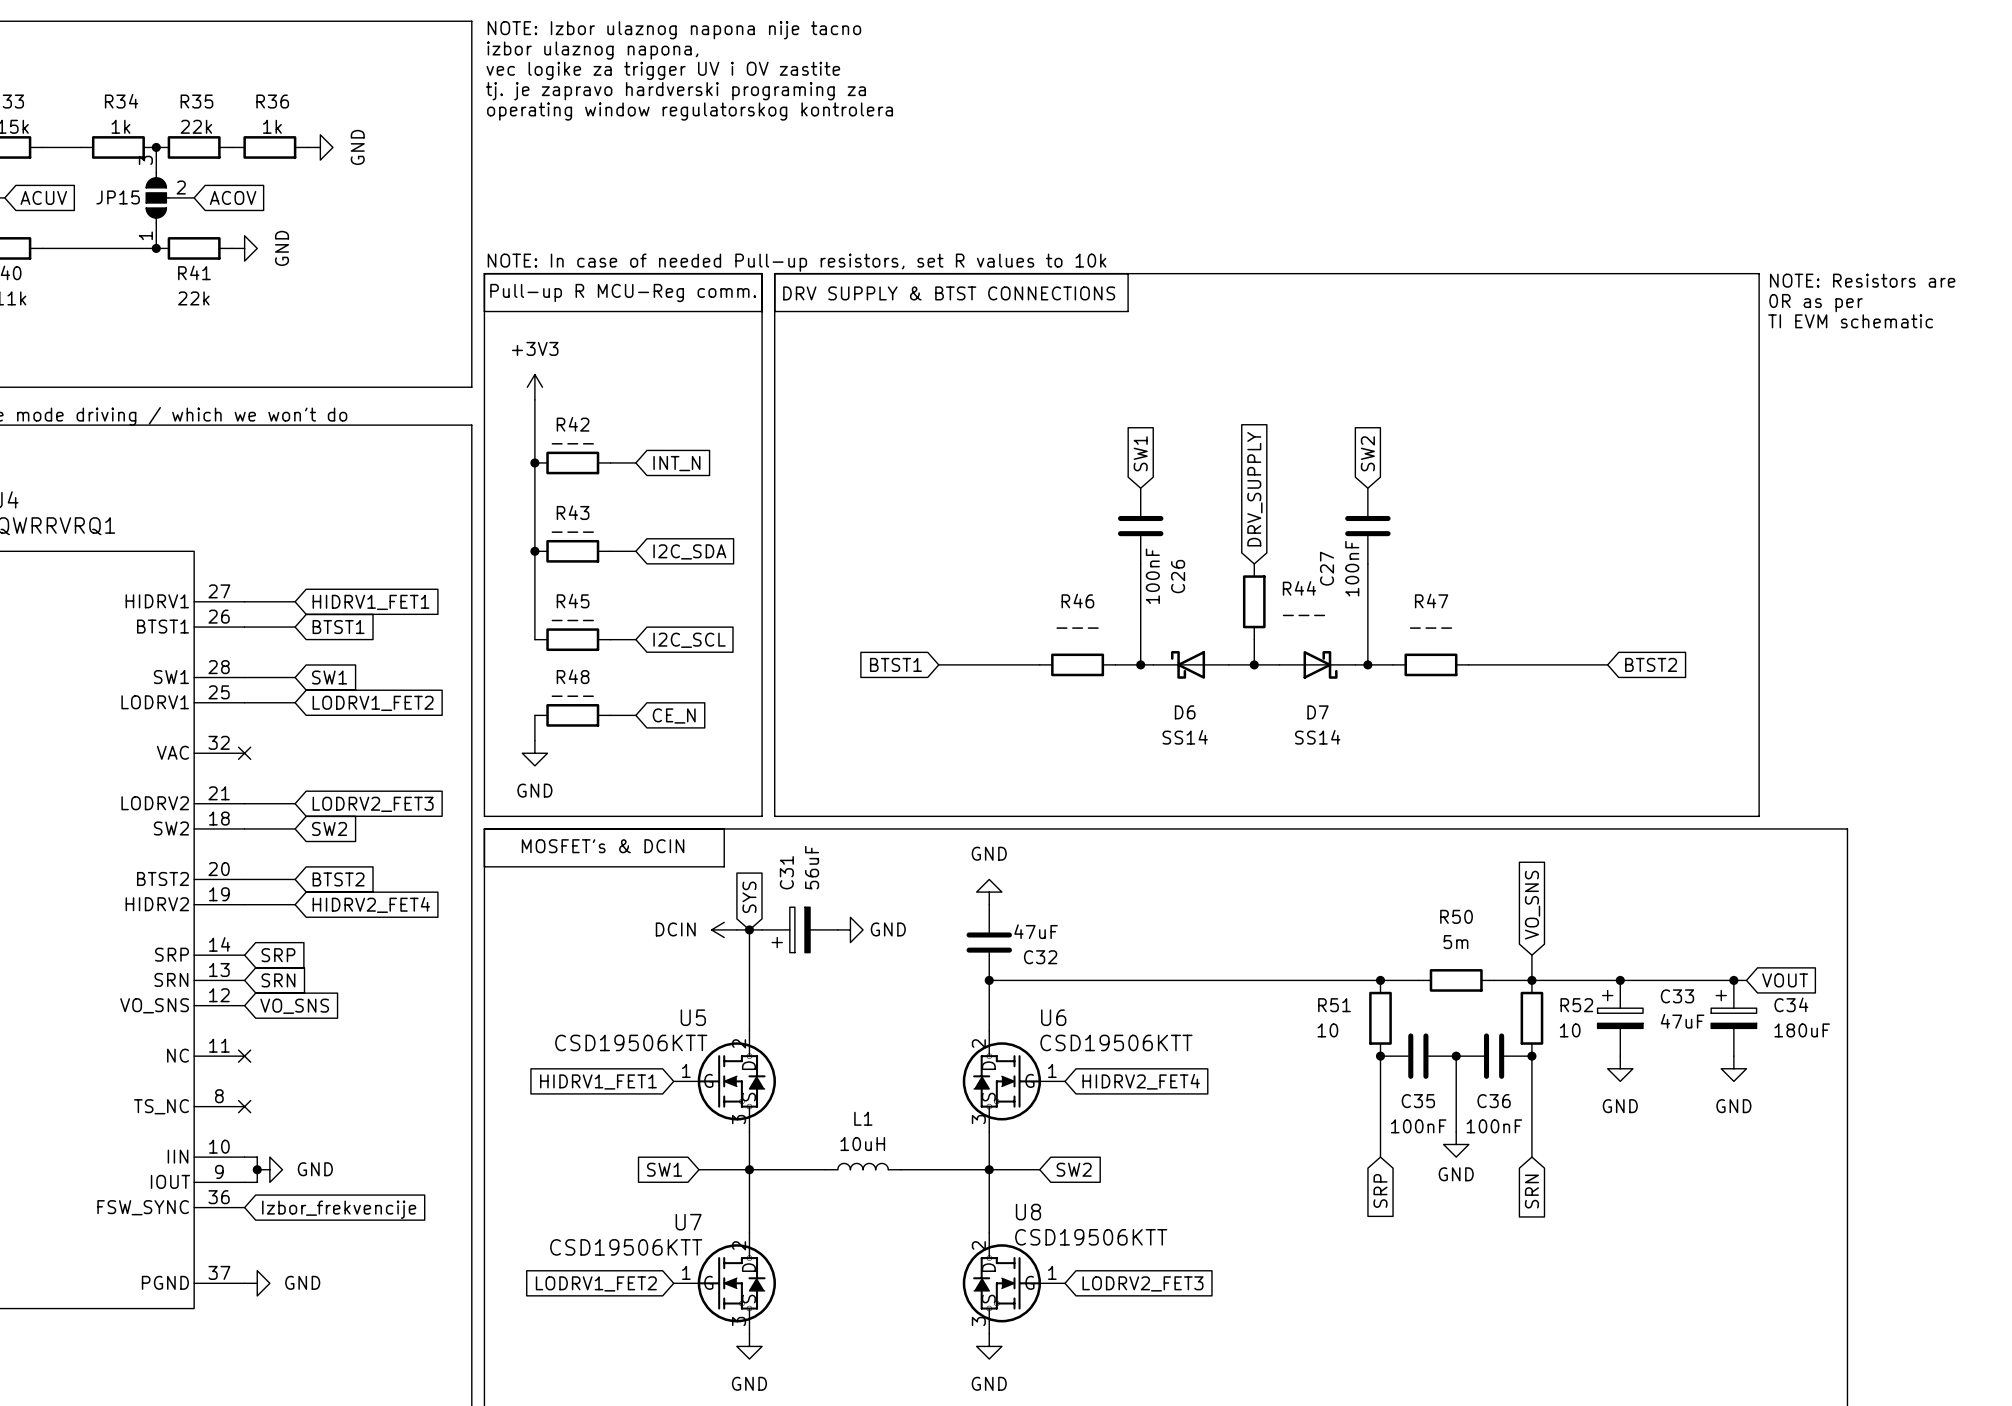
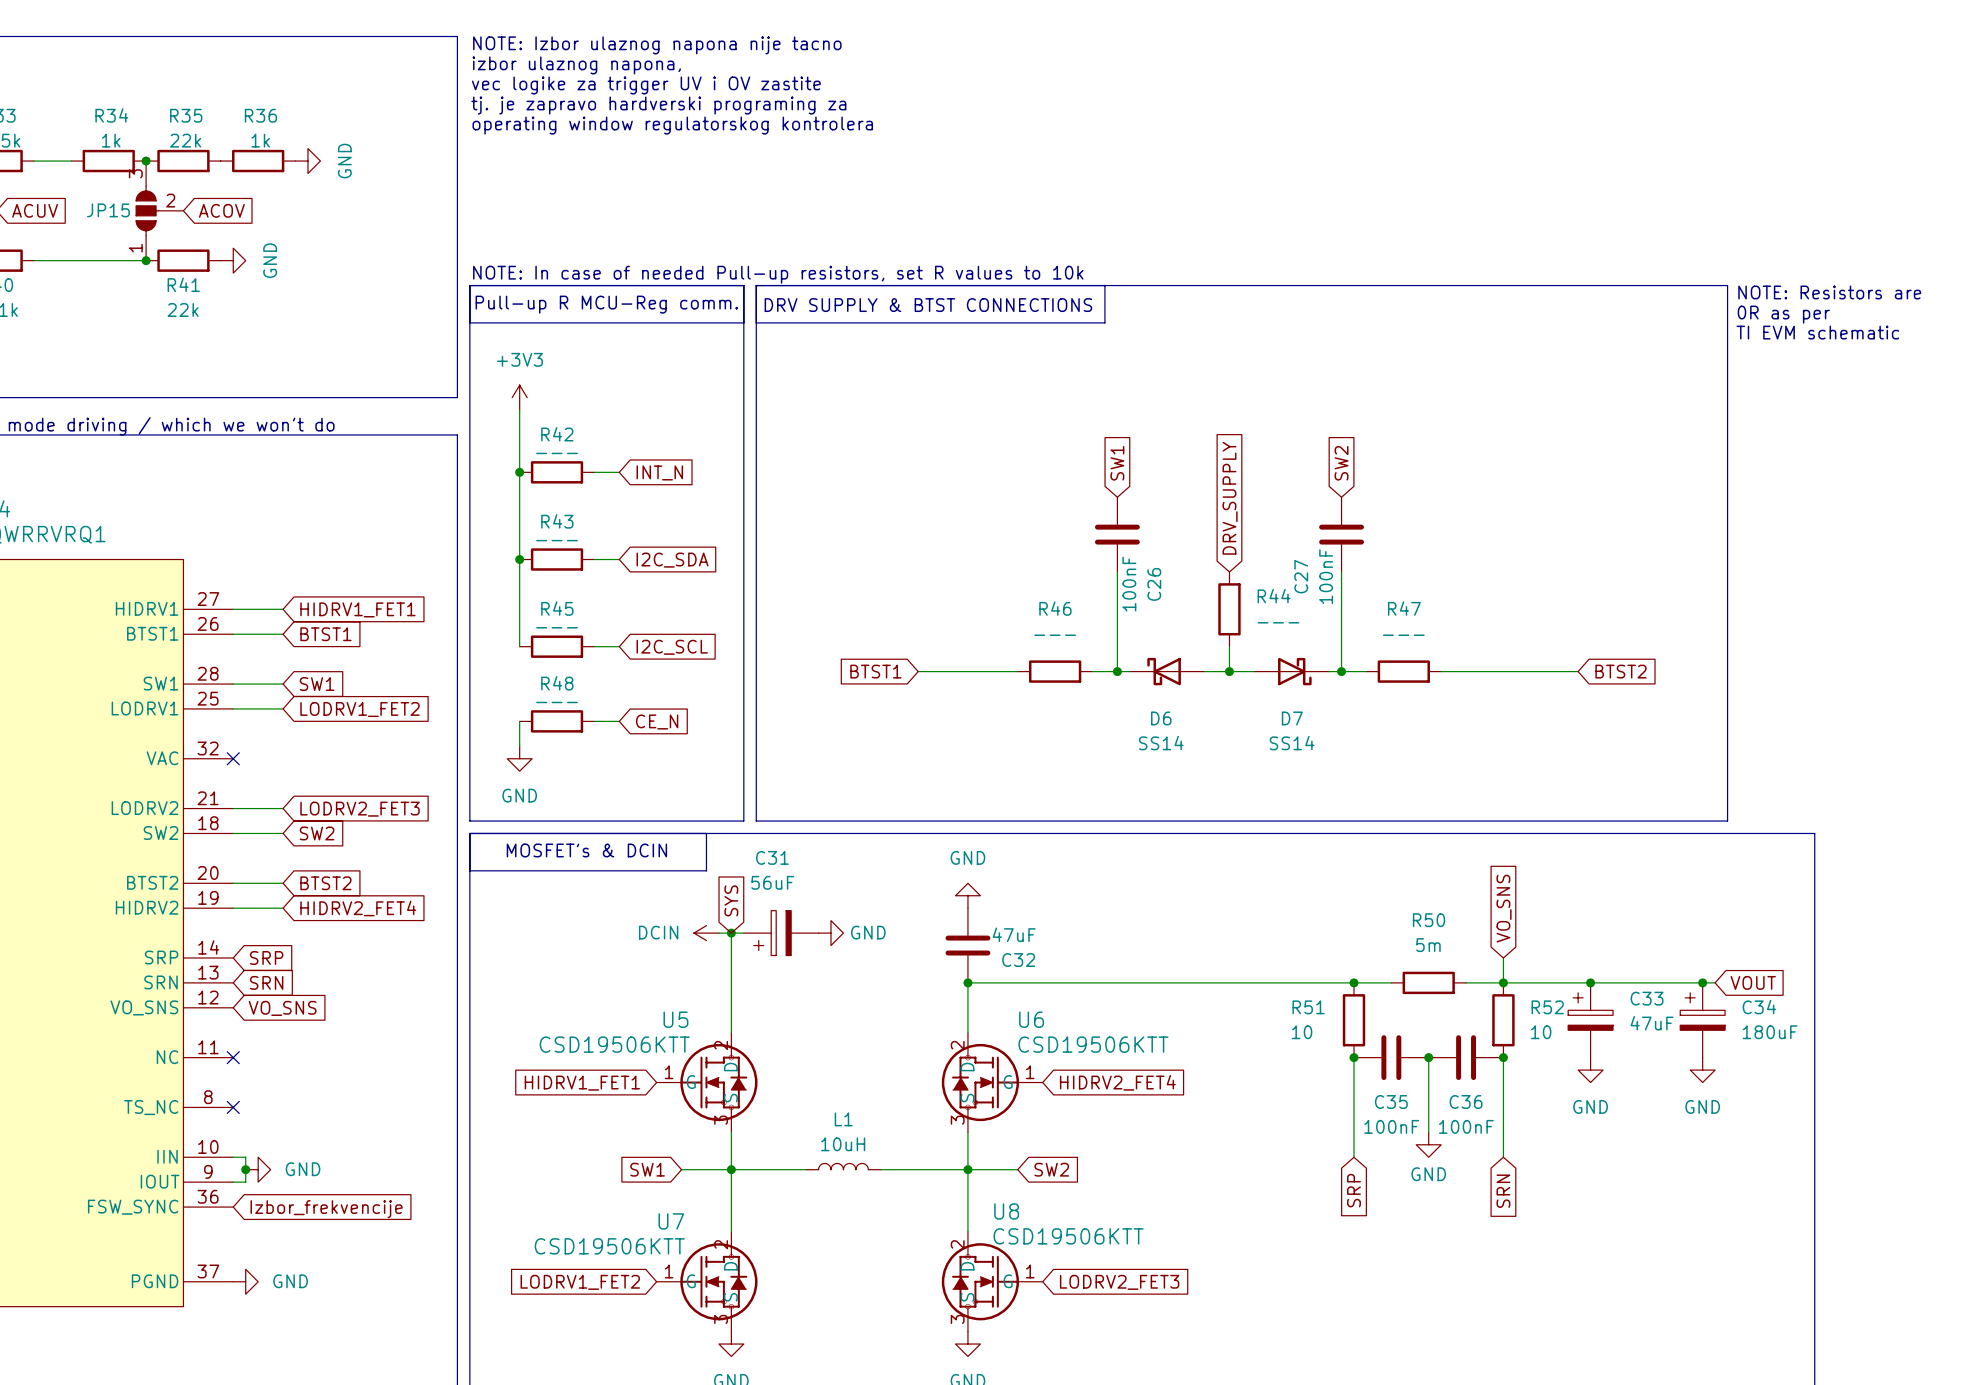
C31 value rotation: 0° (812, 867) -> 90° clockwise (772, 882)
C31 name rotation: 0° (786, 872) -> 90° clockwise (772, 857)

